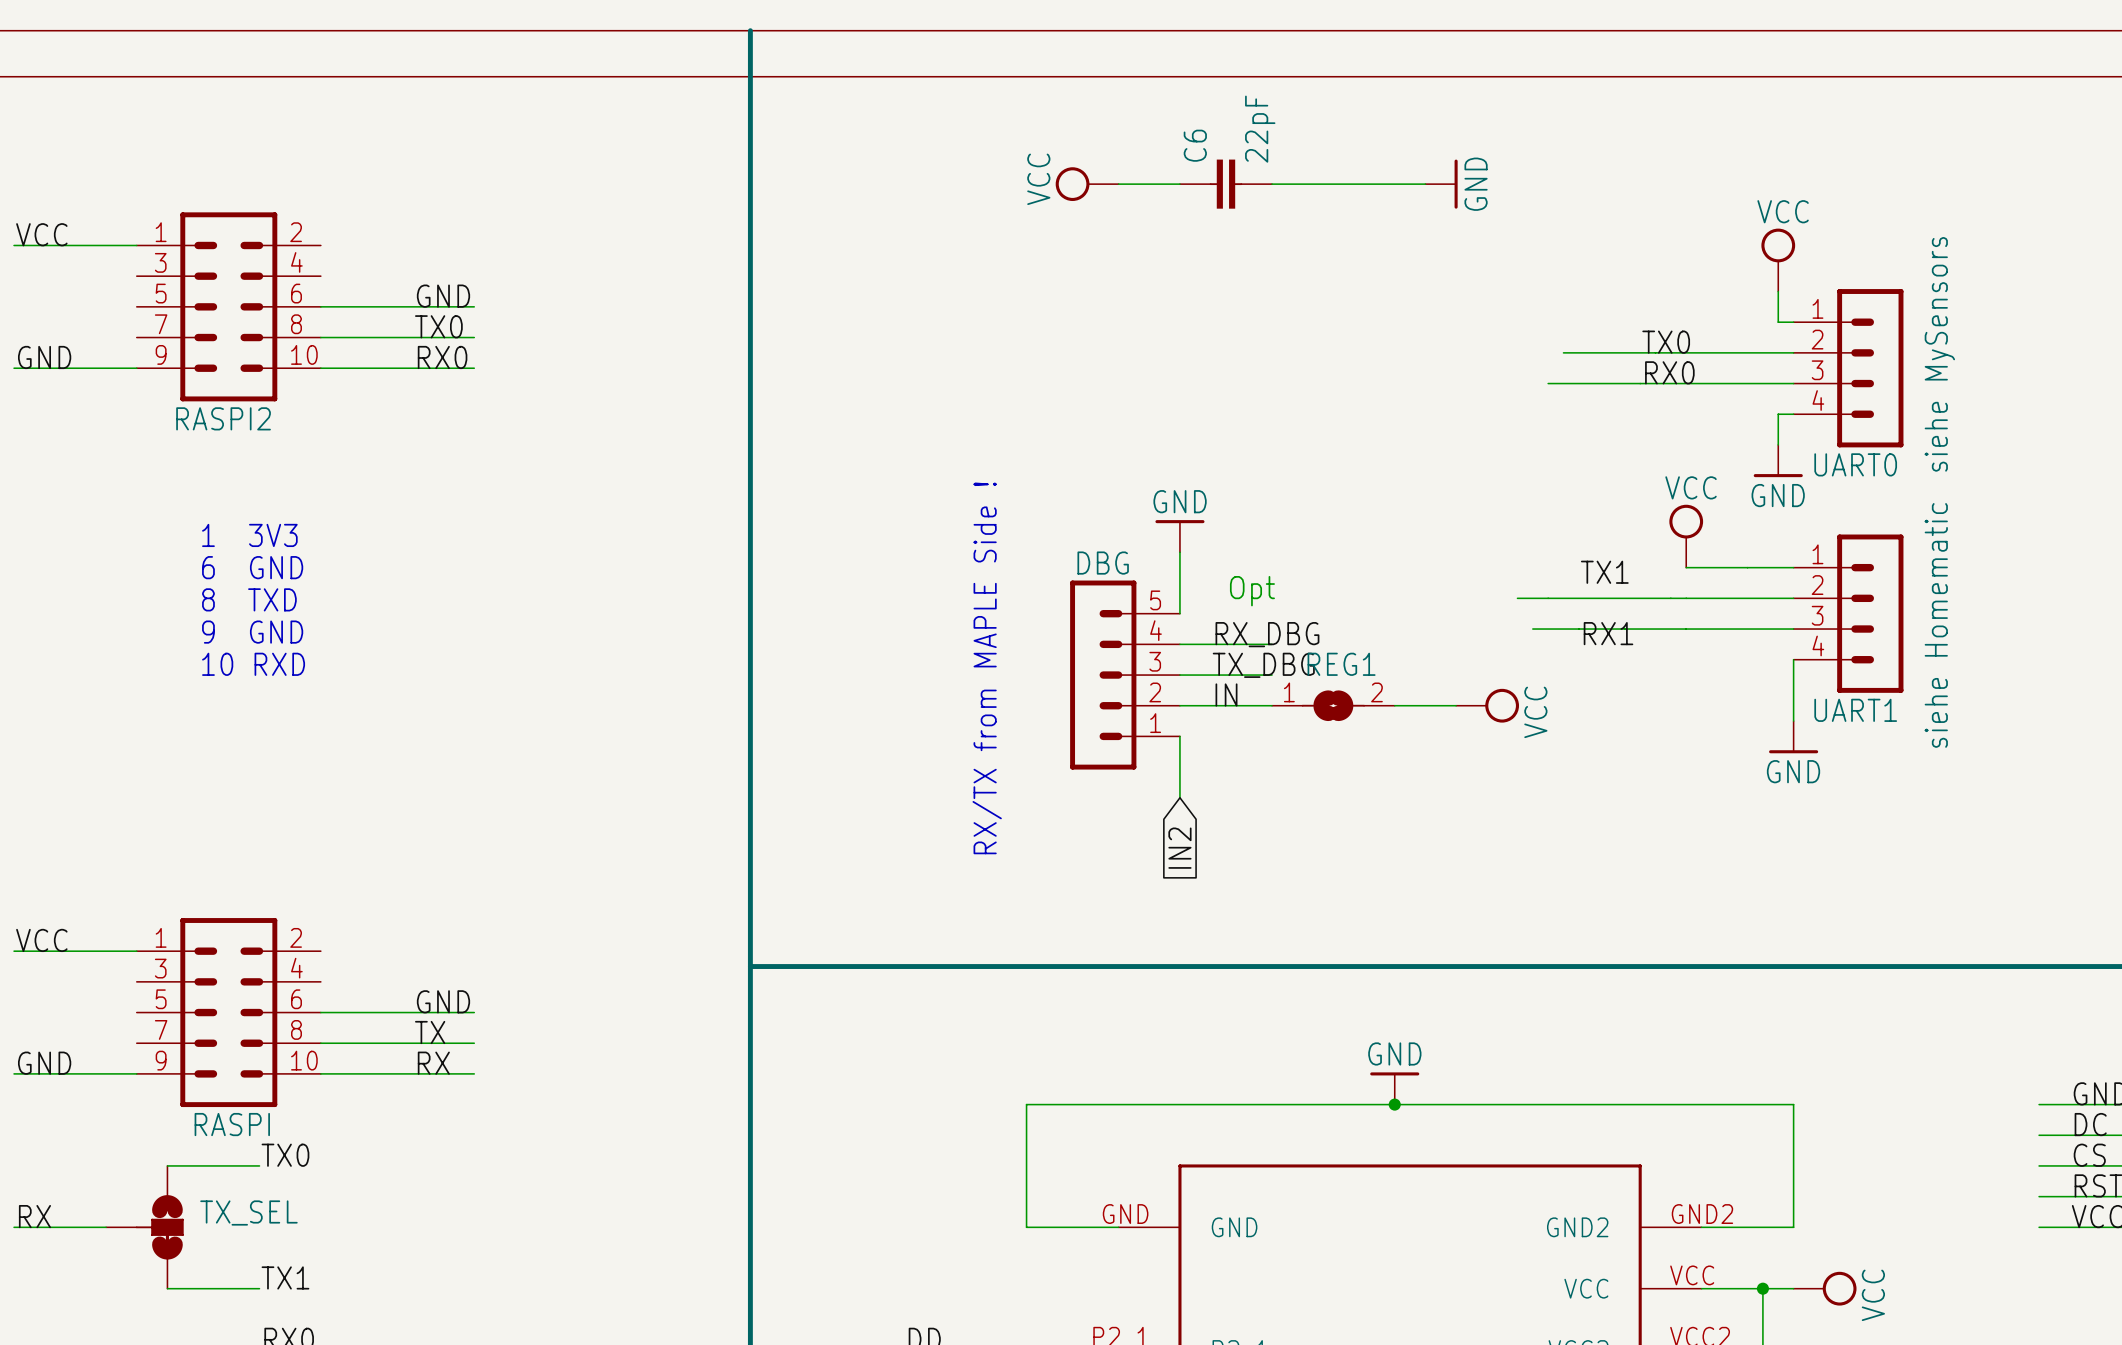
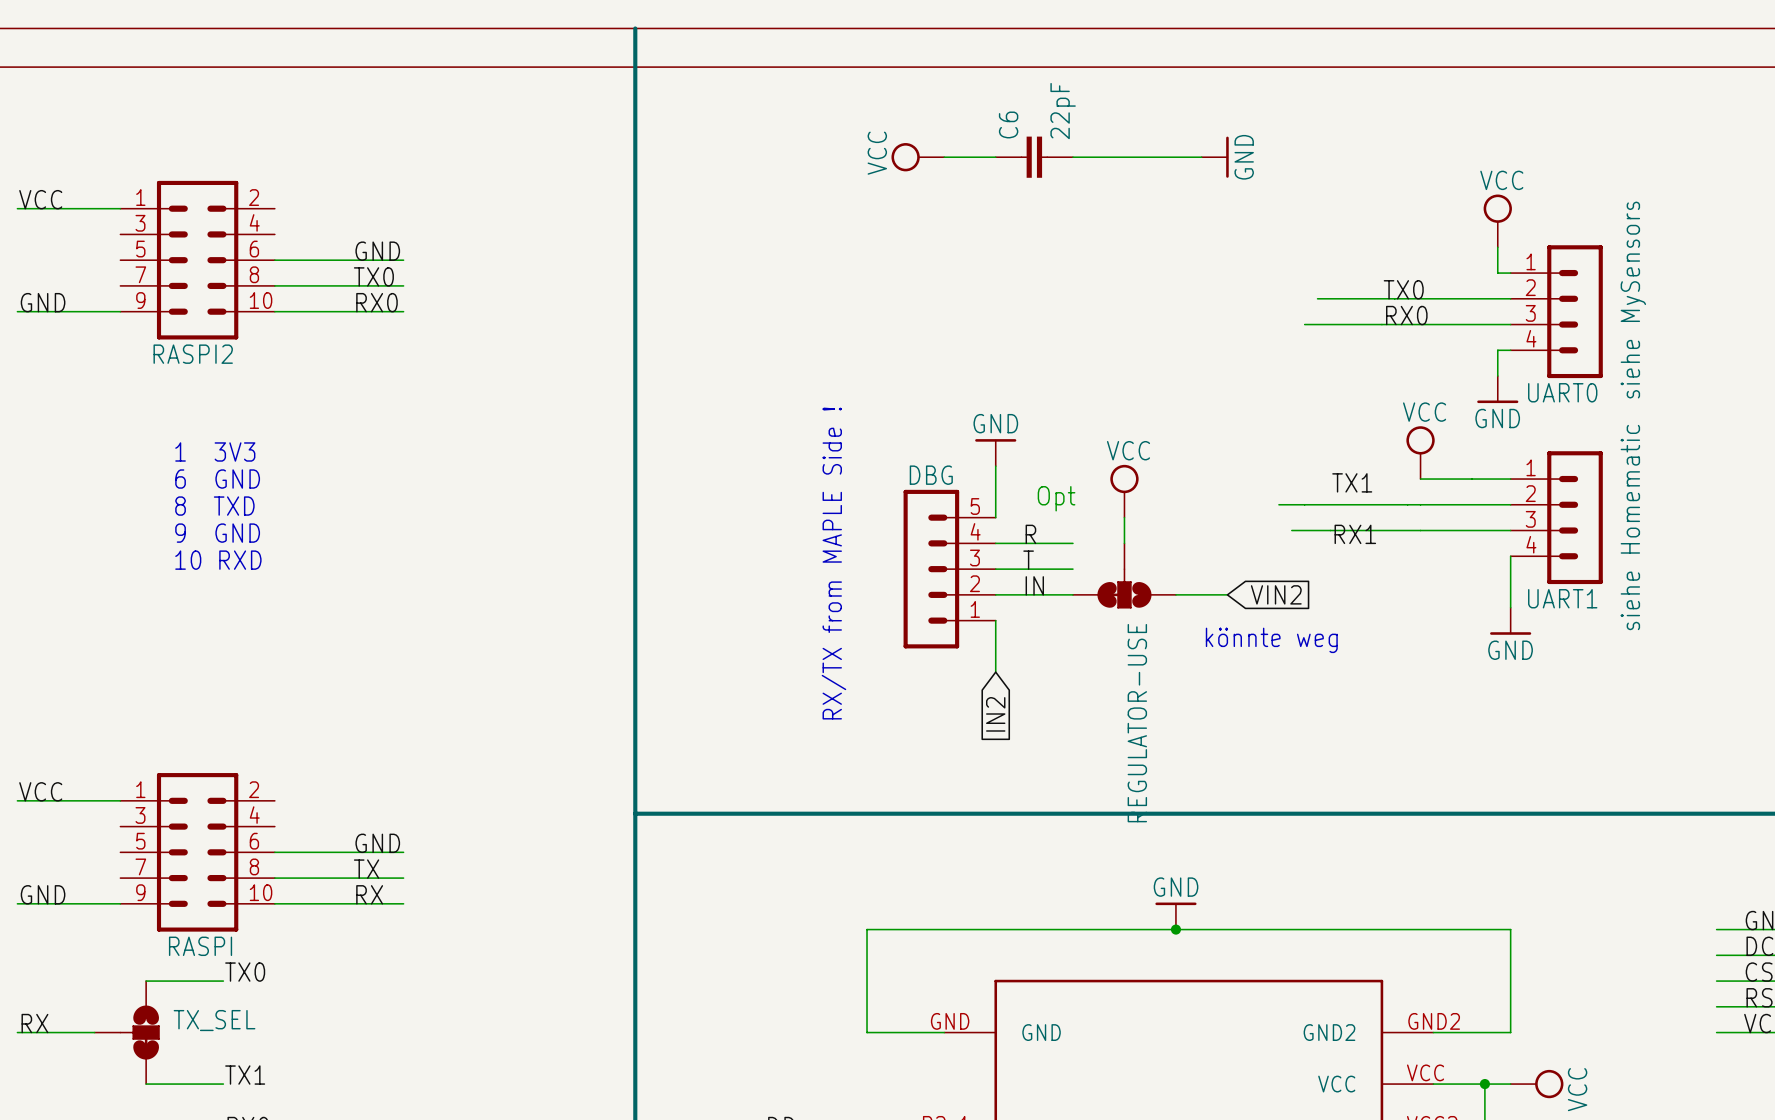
wire: none -> (1124, 517) (1124, 543)
label: RX_DBG (1267, 634) -> R (1030, 534)
label: TX_DBG (1263, 665) -> T (1028, 560)
REGULATOR-USE: none -> (1124, 575)
REG1: (1333, 705) -> none
power symbol position: VCC (1487, 705) -> VCC (1124, 491)
power symbol rotation: 0° (1502, 705) -> 90° counterclockwise (1124, 479)
global label: none -> VIN2 (1276, 594)
text: none -> könnte weg (1271, 640)

